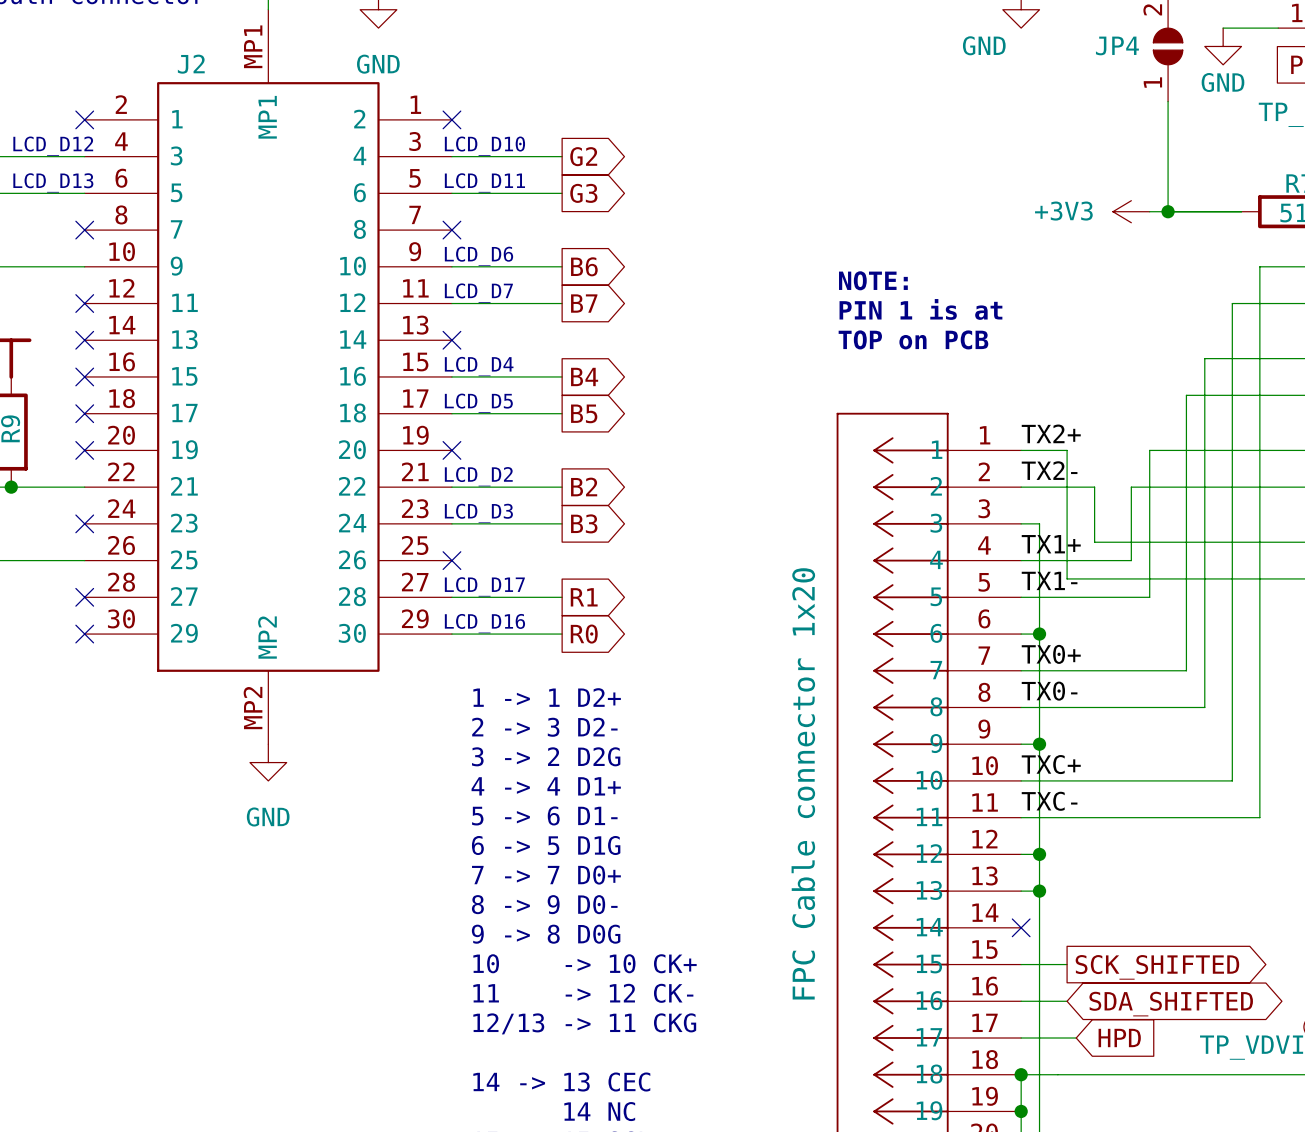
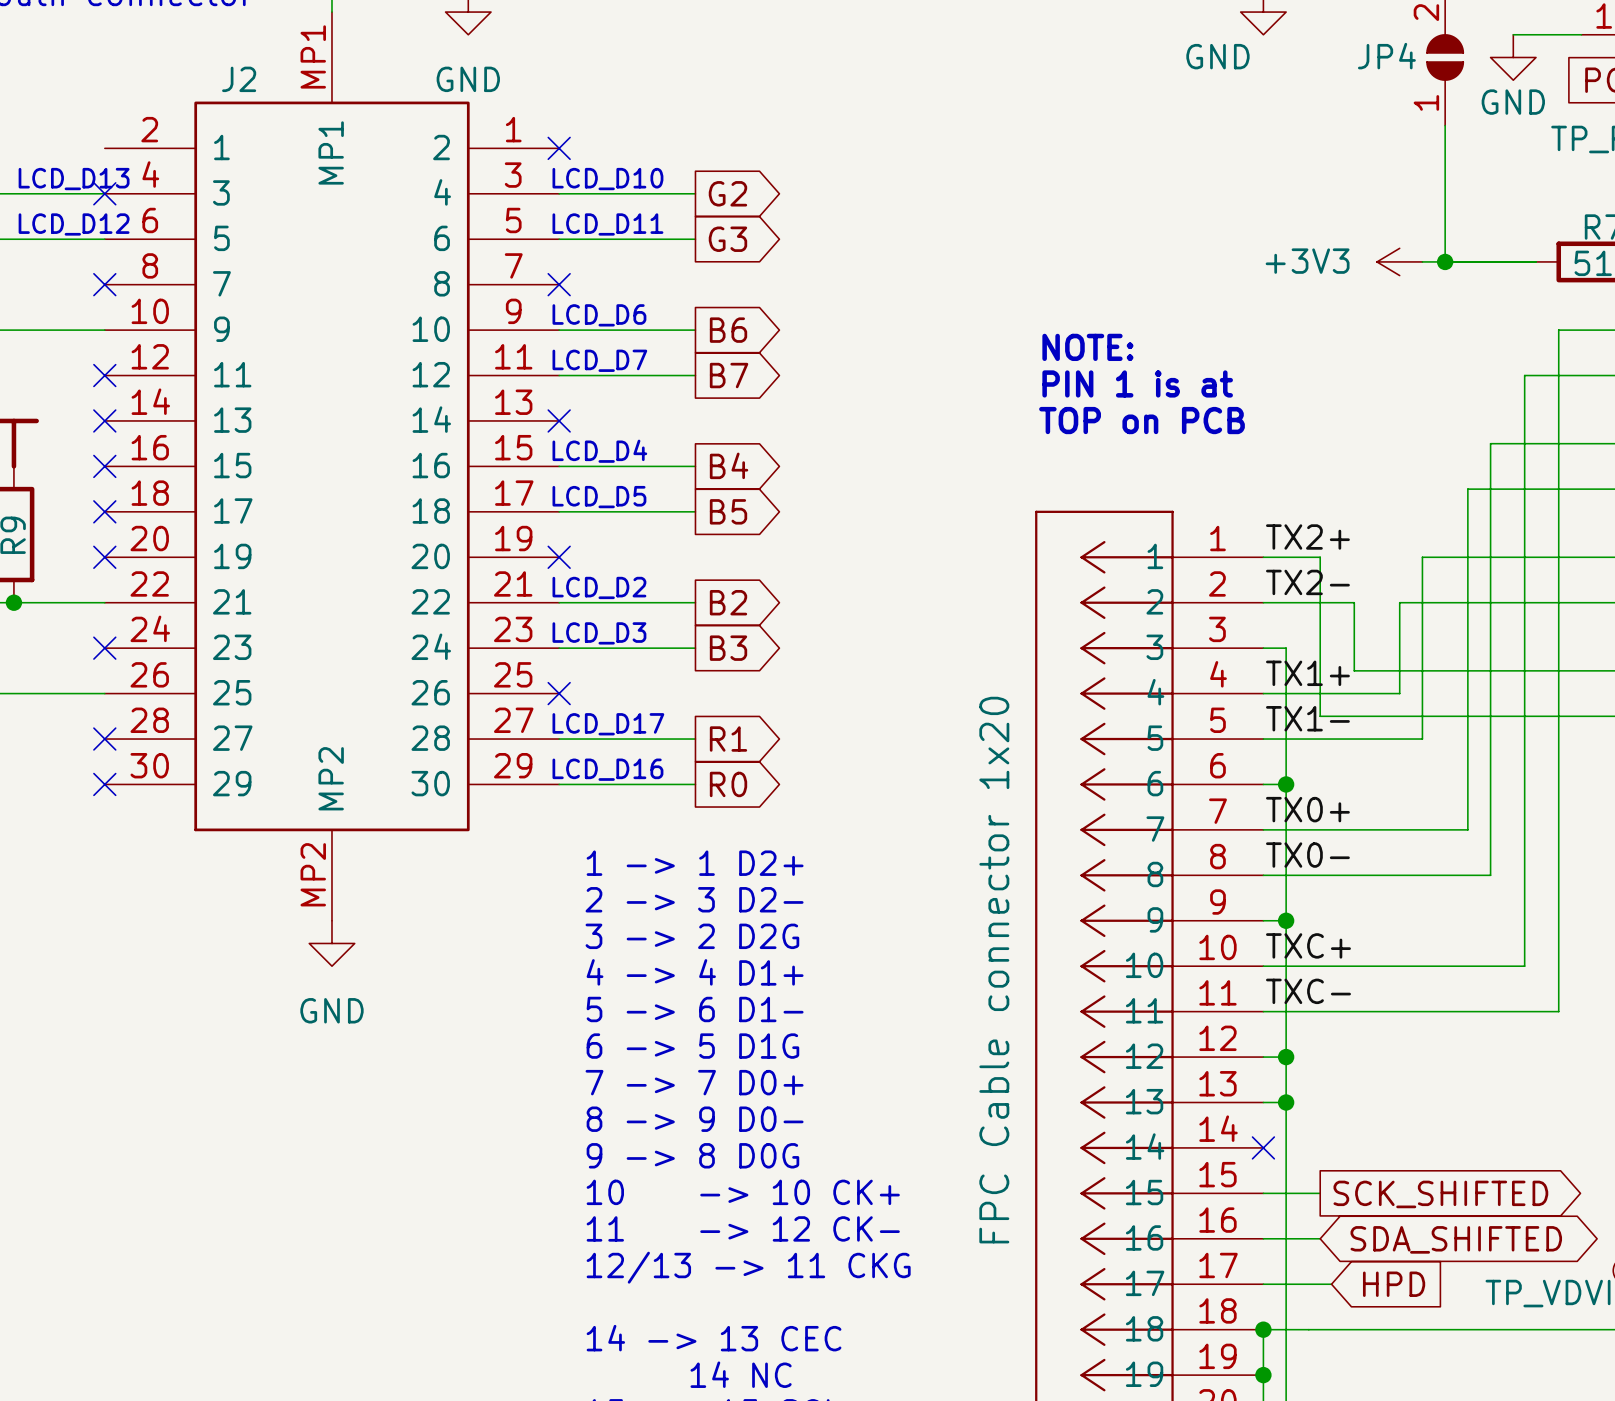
no-connect mark position: (84, 119) -> (104, 193)
text: LCD_D12 (53, 146) -> LCD_D13 (74, 179)
text: LCD_D13 (53, 182) -> LCD_D12 (74, 224)

